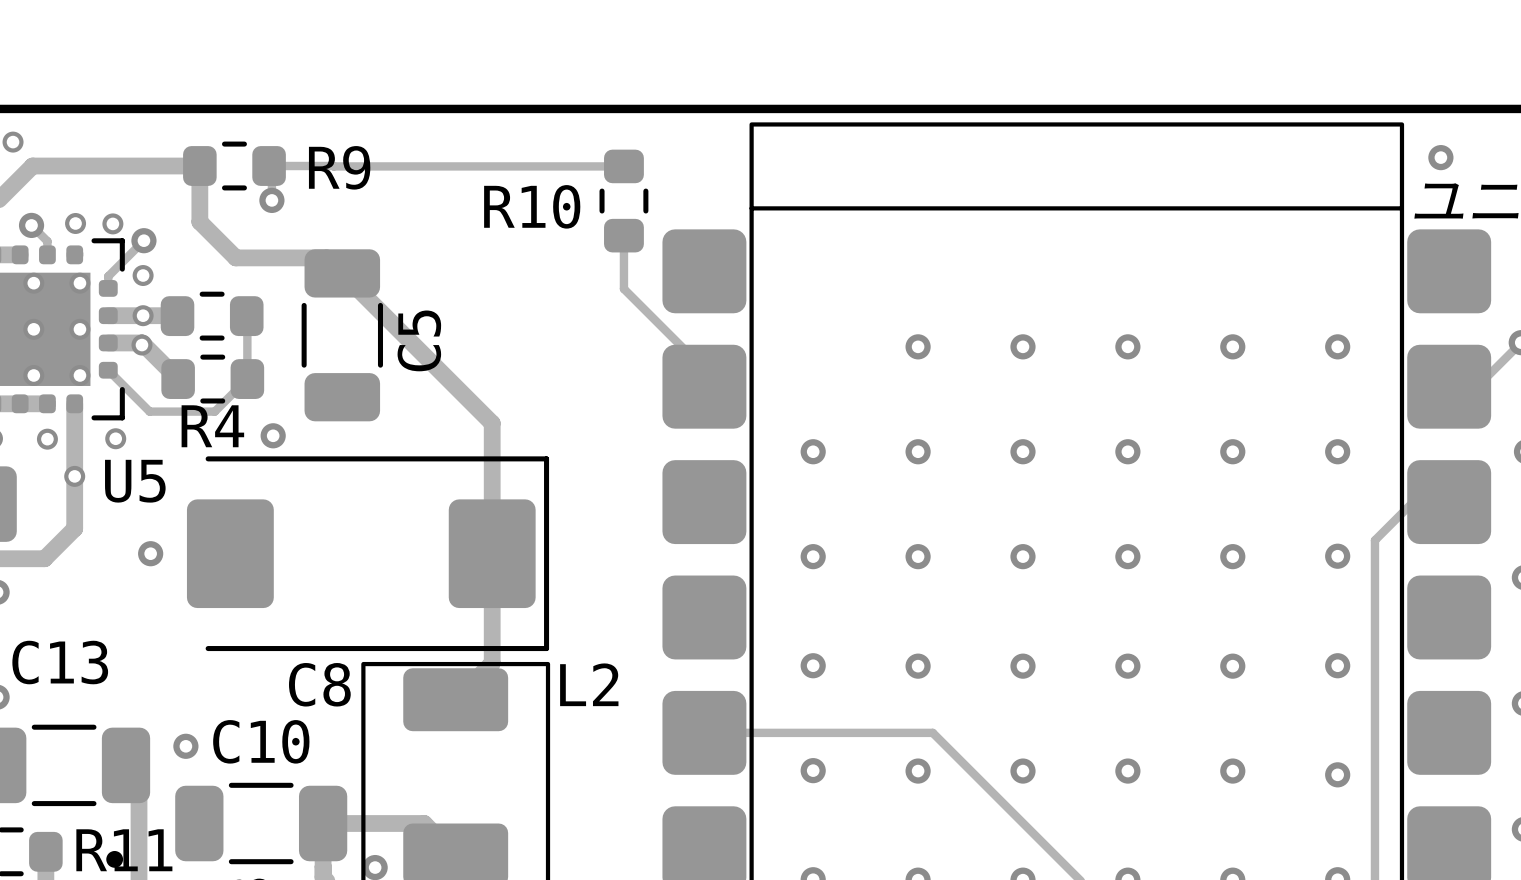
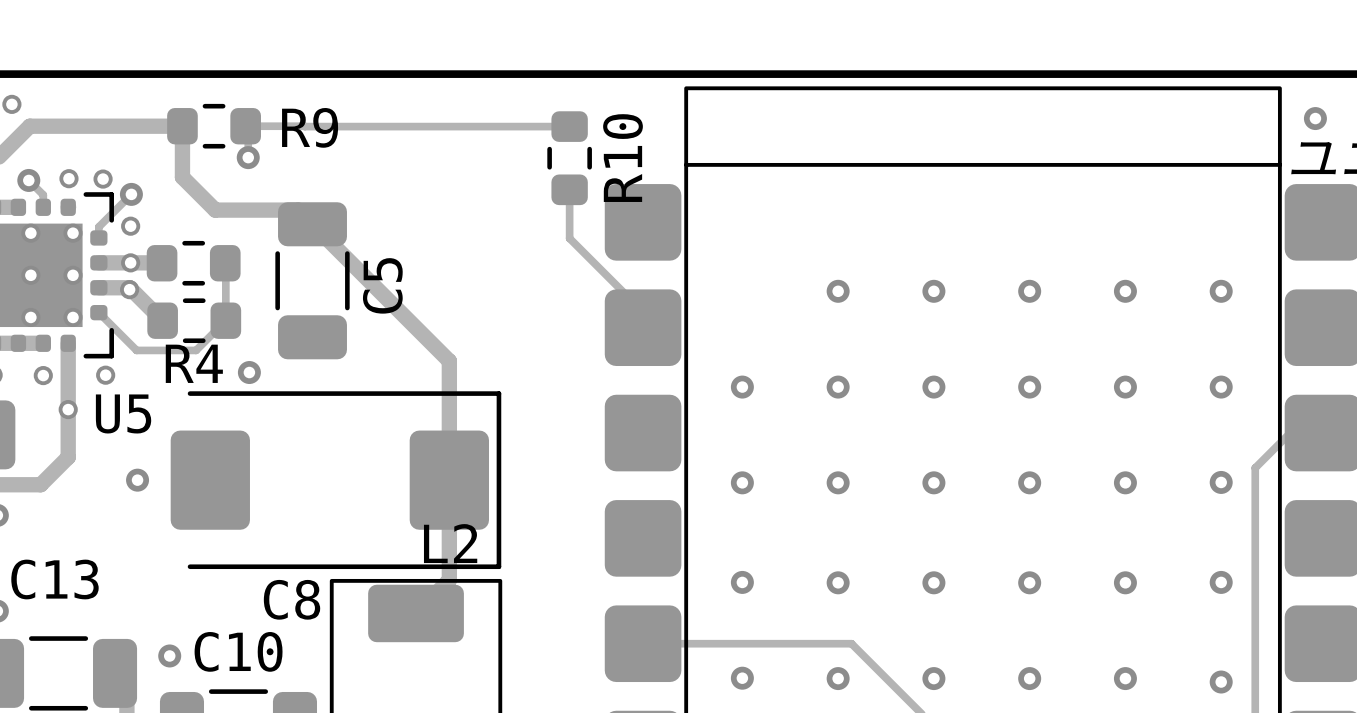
R10 name rotation: 0° (532, 206) -> 90° counterclockwise (623, 158)
R10 name position: R10 (532, 206) -> R10 (623, 158)
L2 name position: L2 (589, 684) -> L2 (450, 543)

